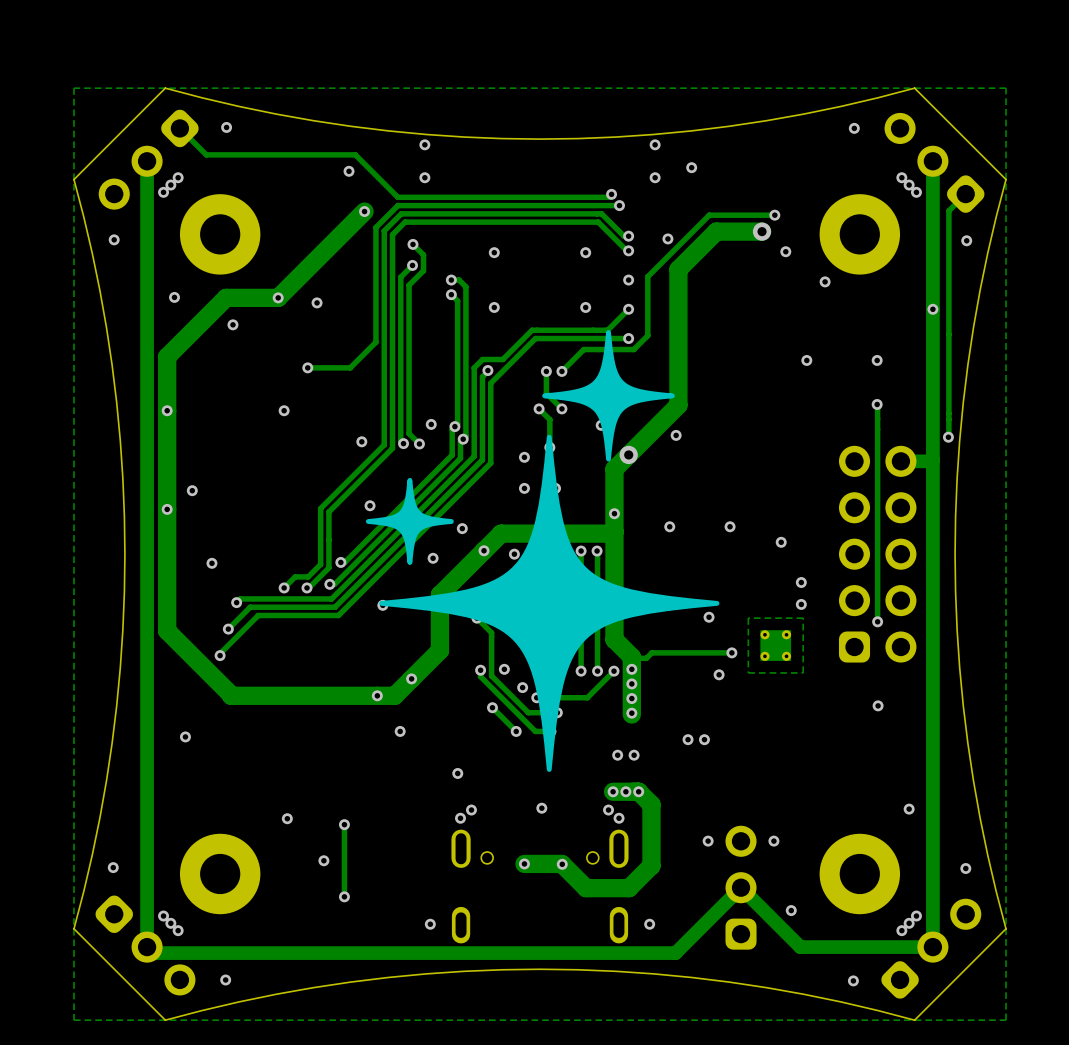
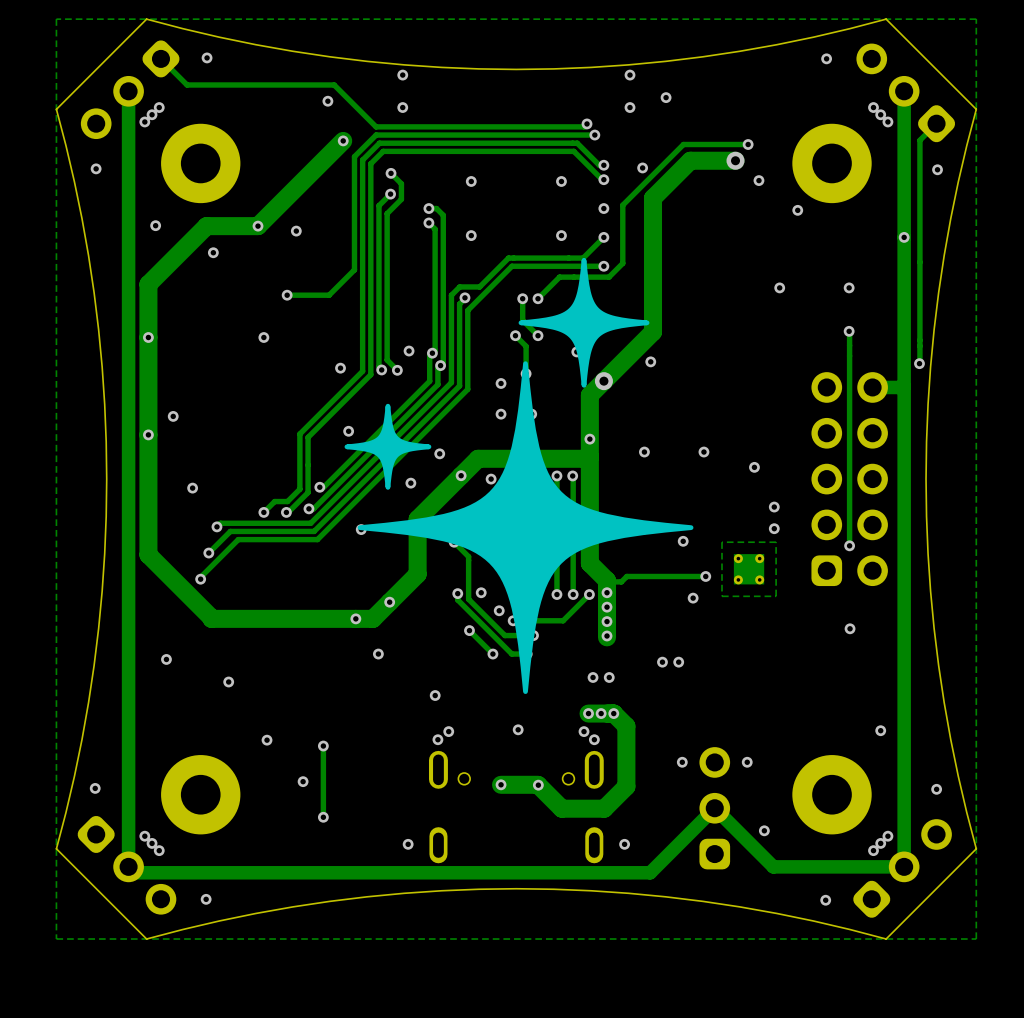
via: none -> (228, 682)

